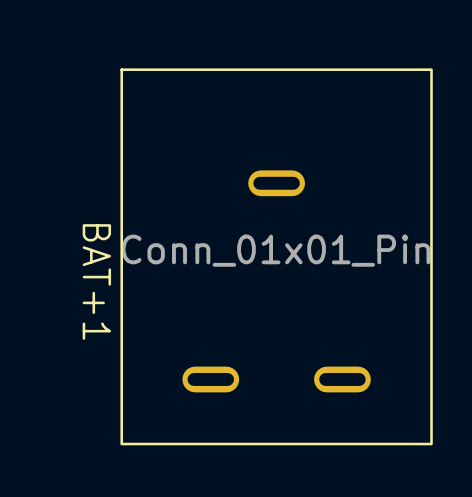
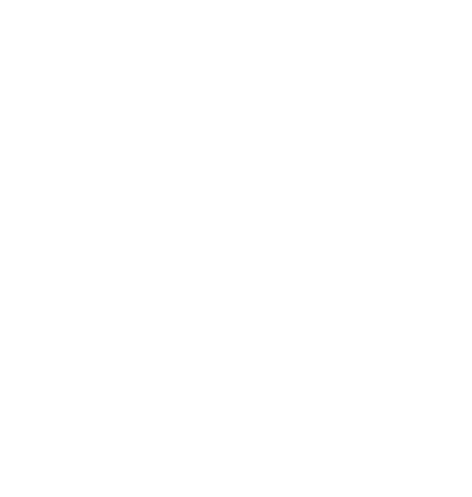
BAT+1: Conn_01x01_Pin (276, 256) -> none

